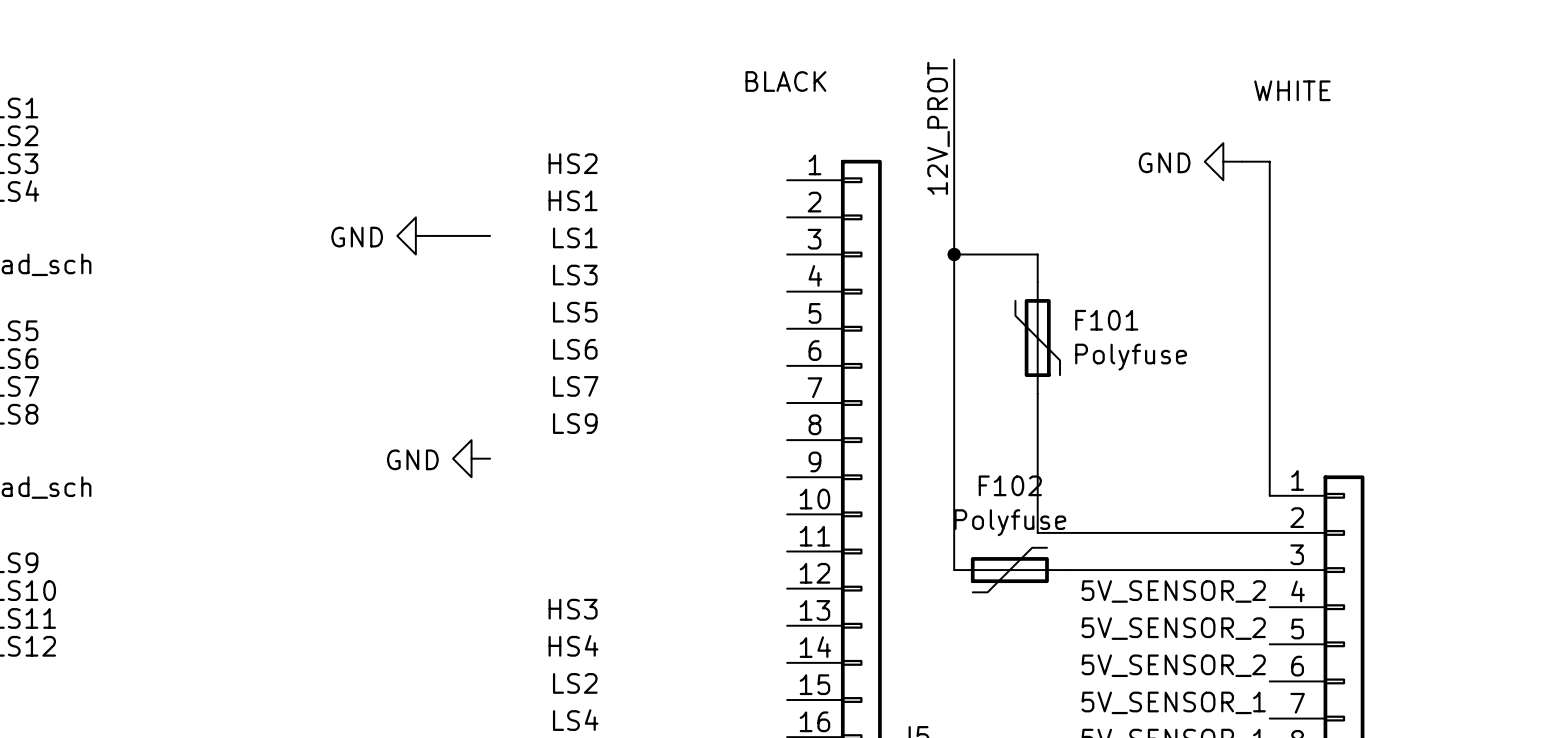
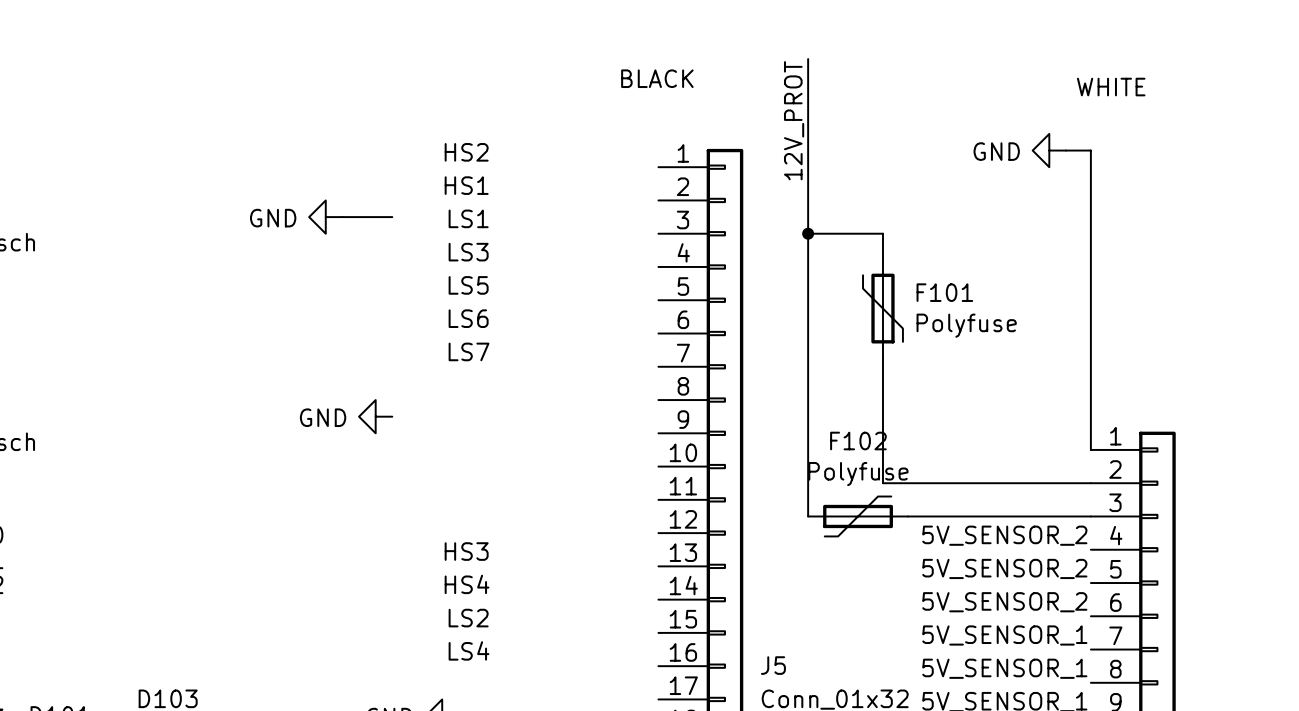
label: LS9 (575, 423) -> none

